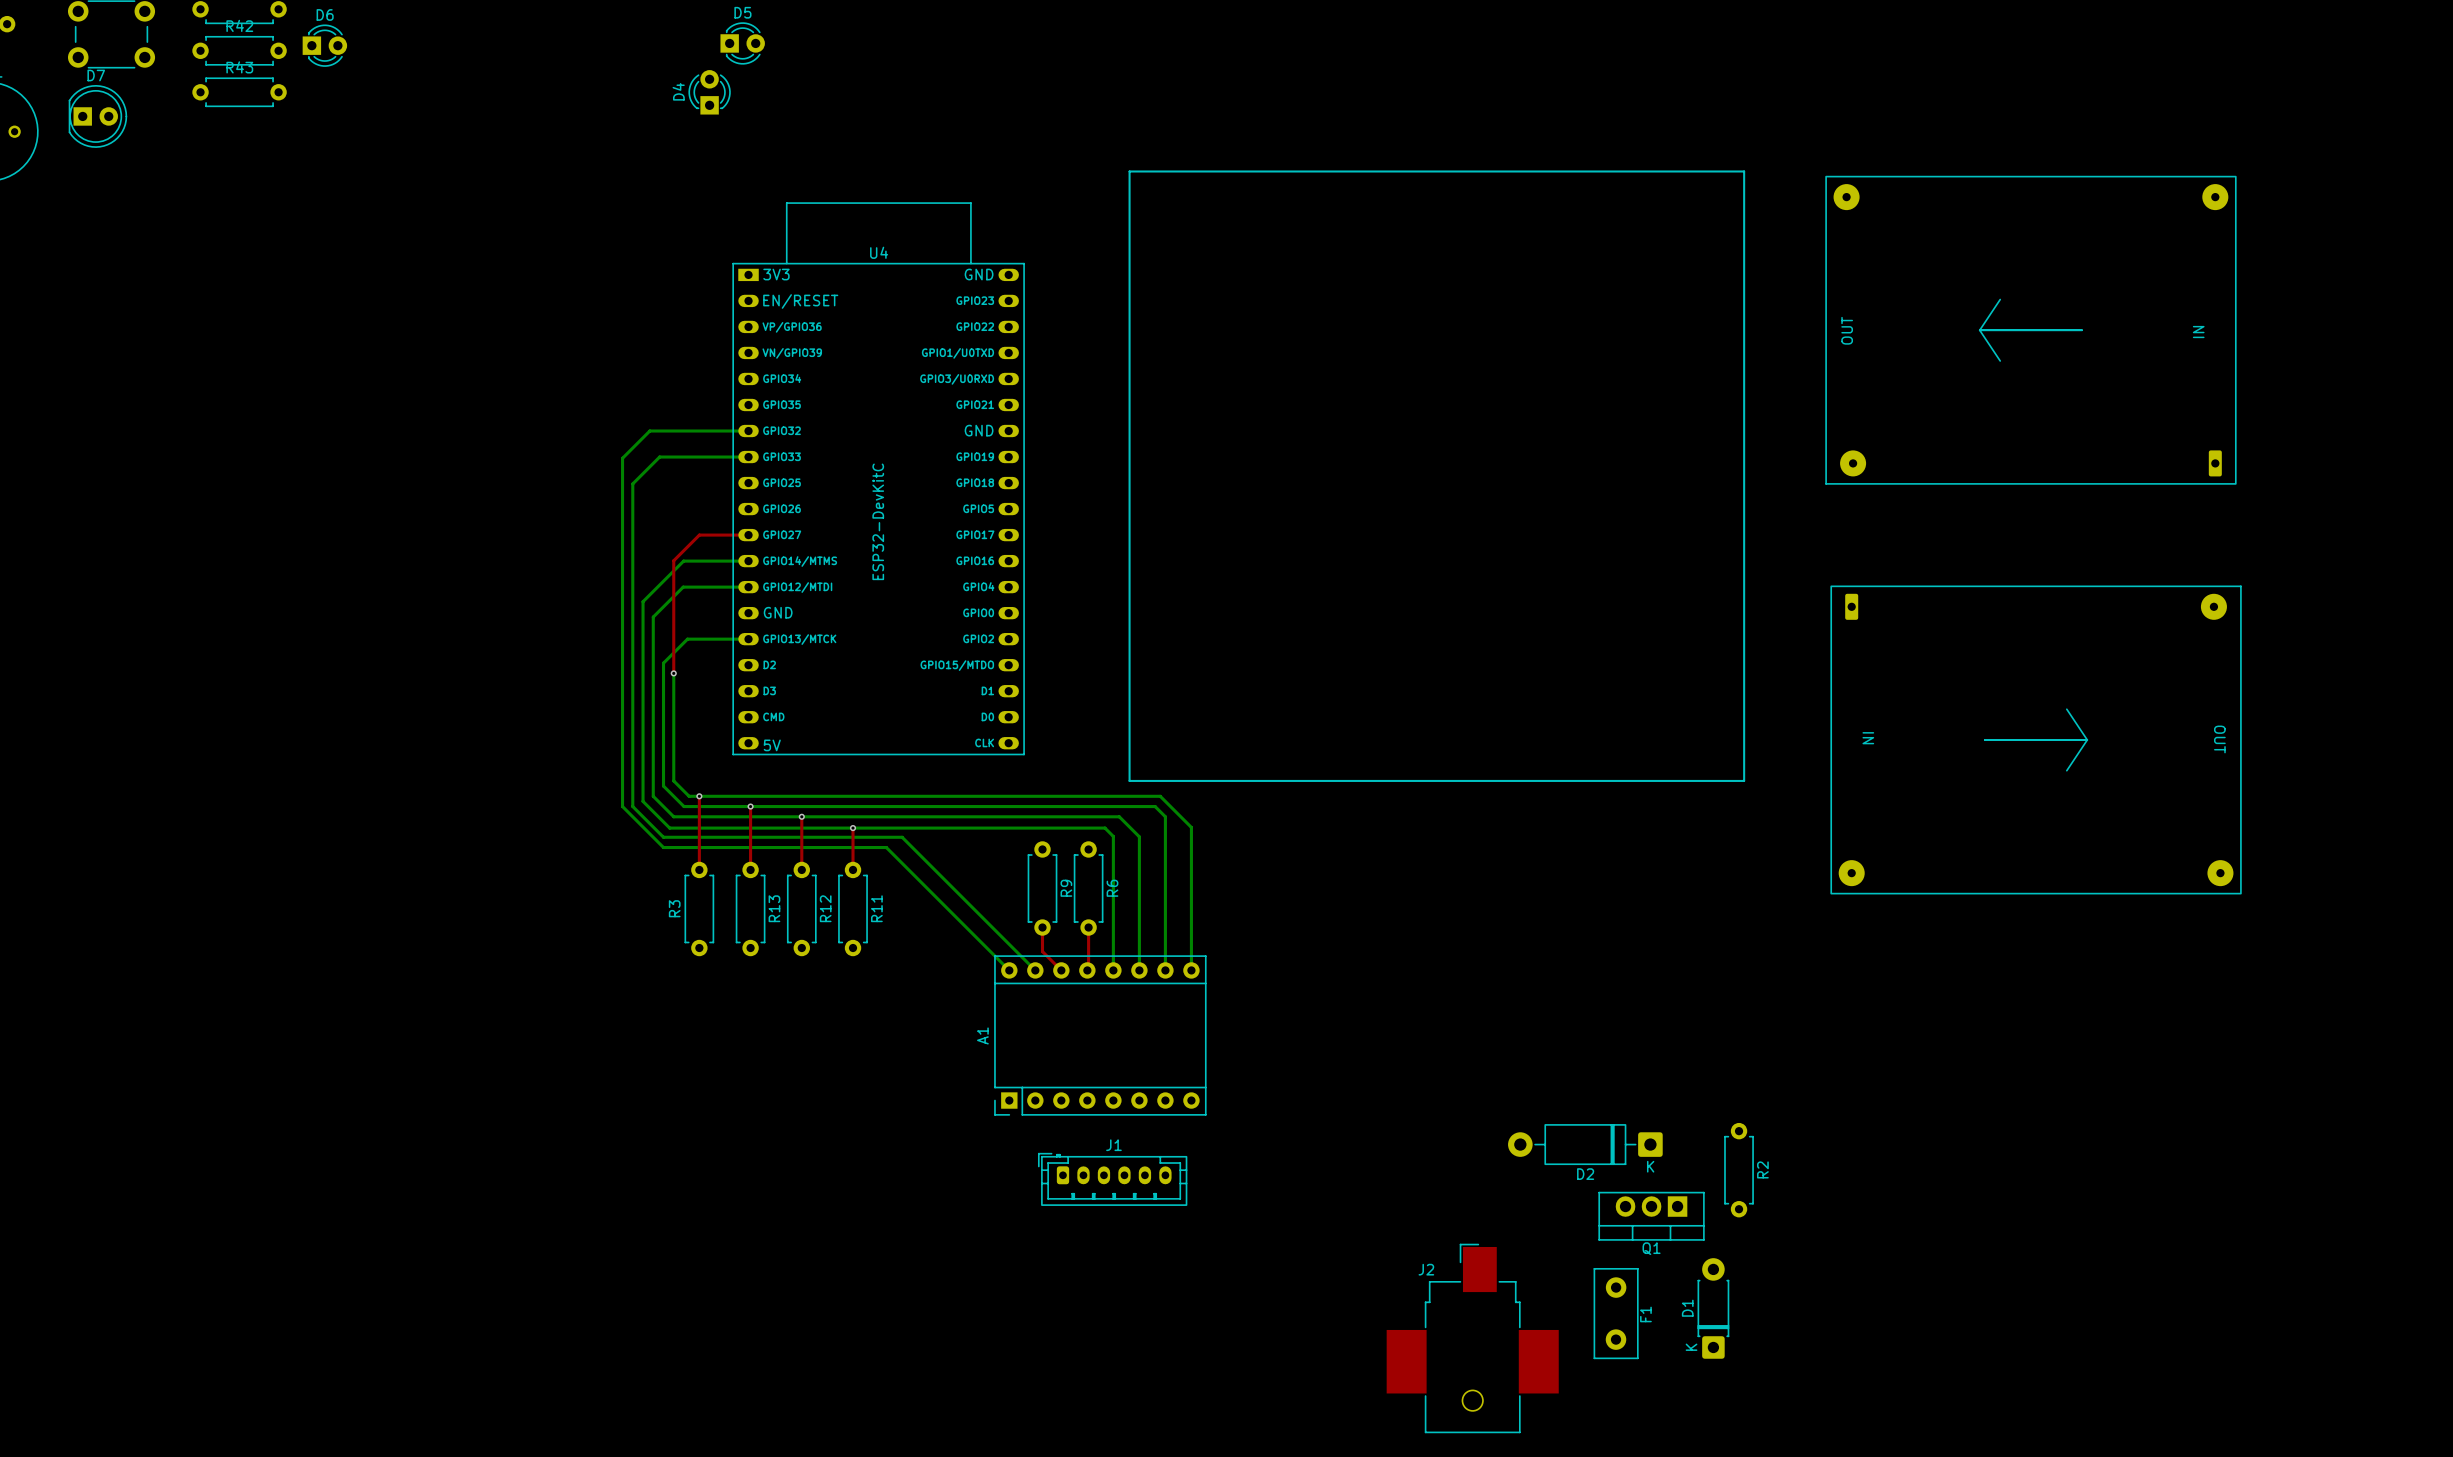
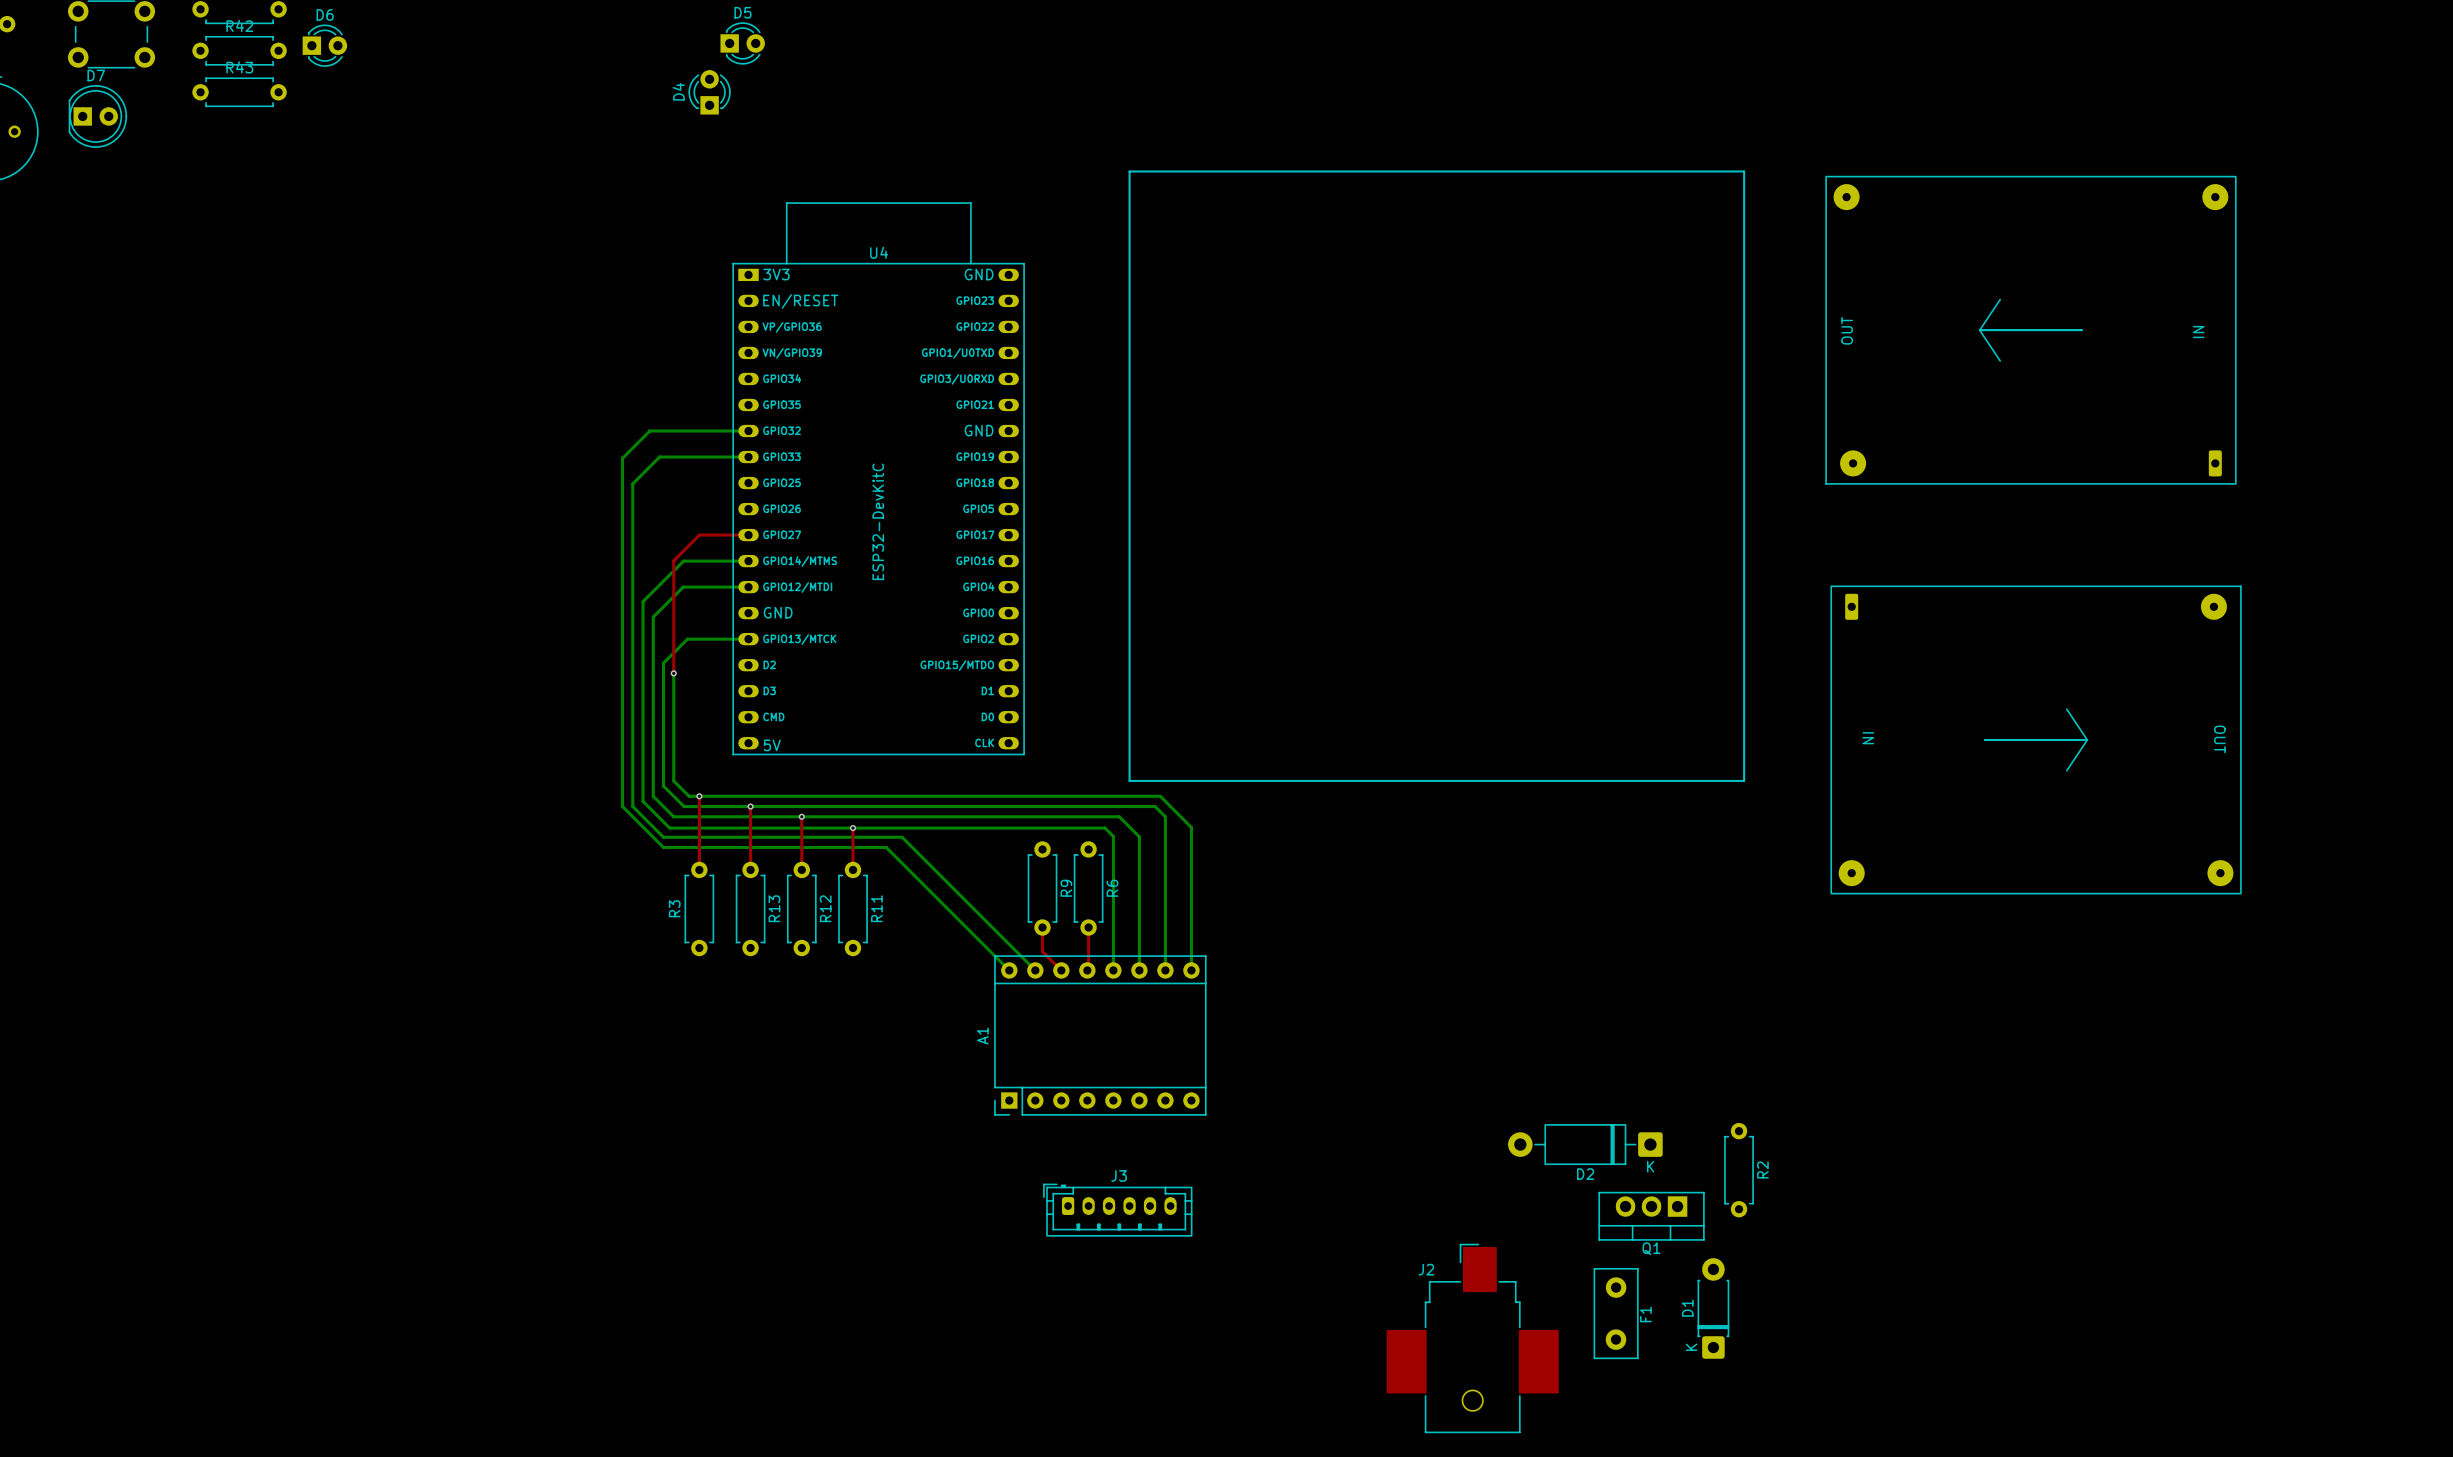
J1: (1112, 1179) -> none
J3: none -> (1117, 1210)

